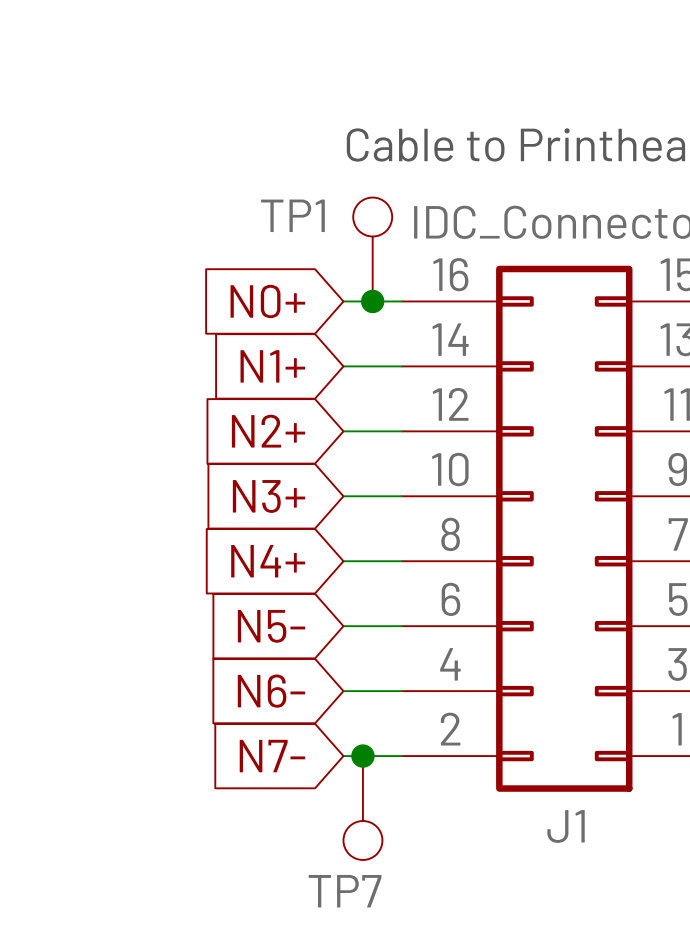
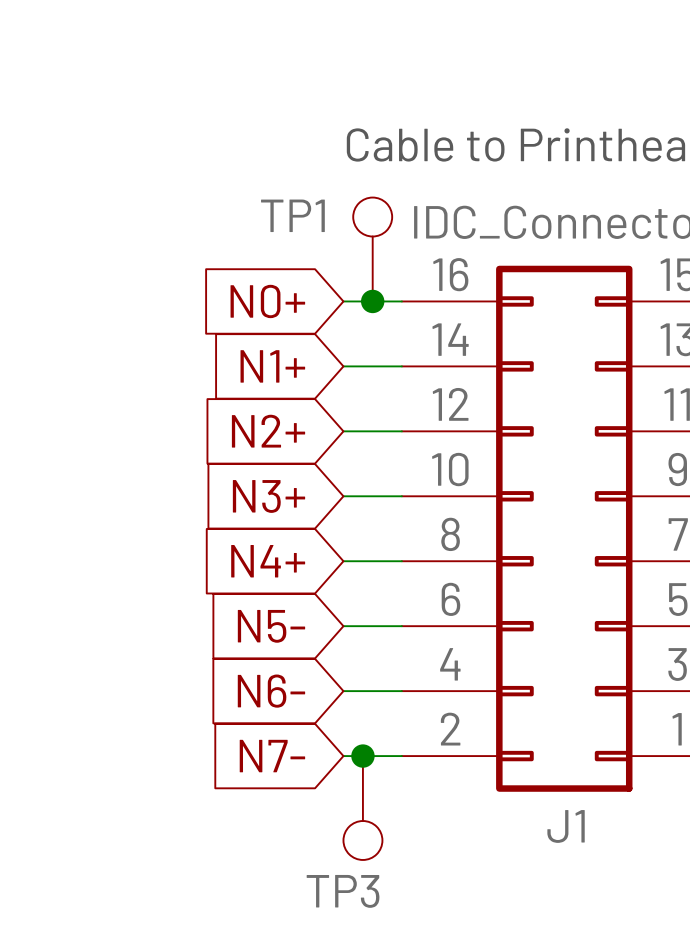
TP7 name: TP7 (345, 891) -> TP3 (343, 891)

